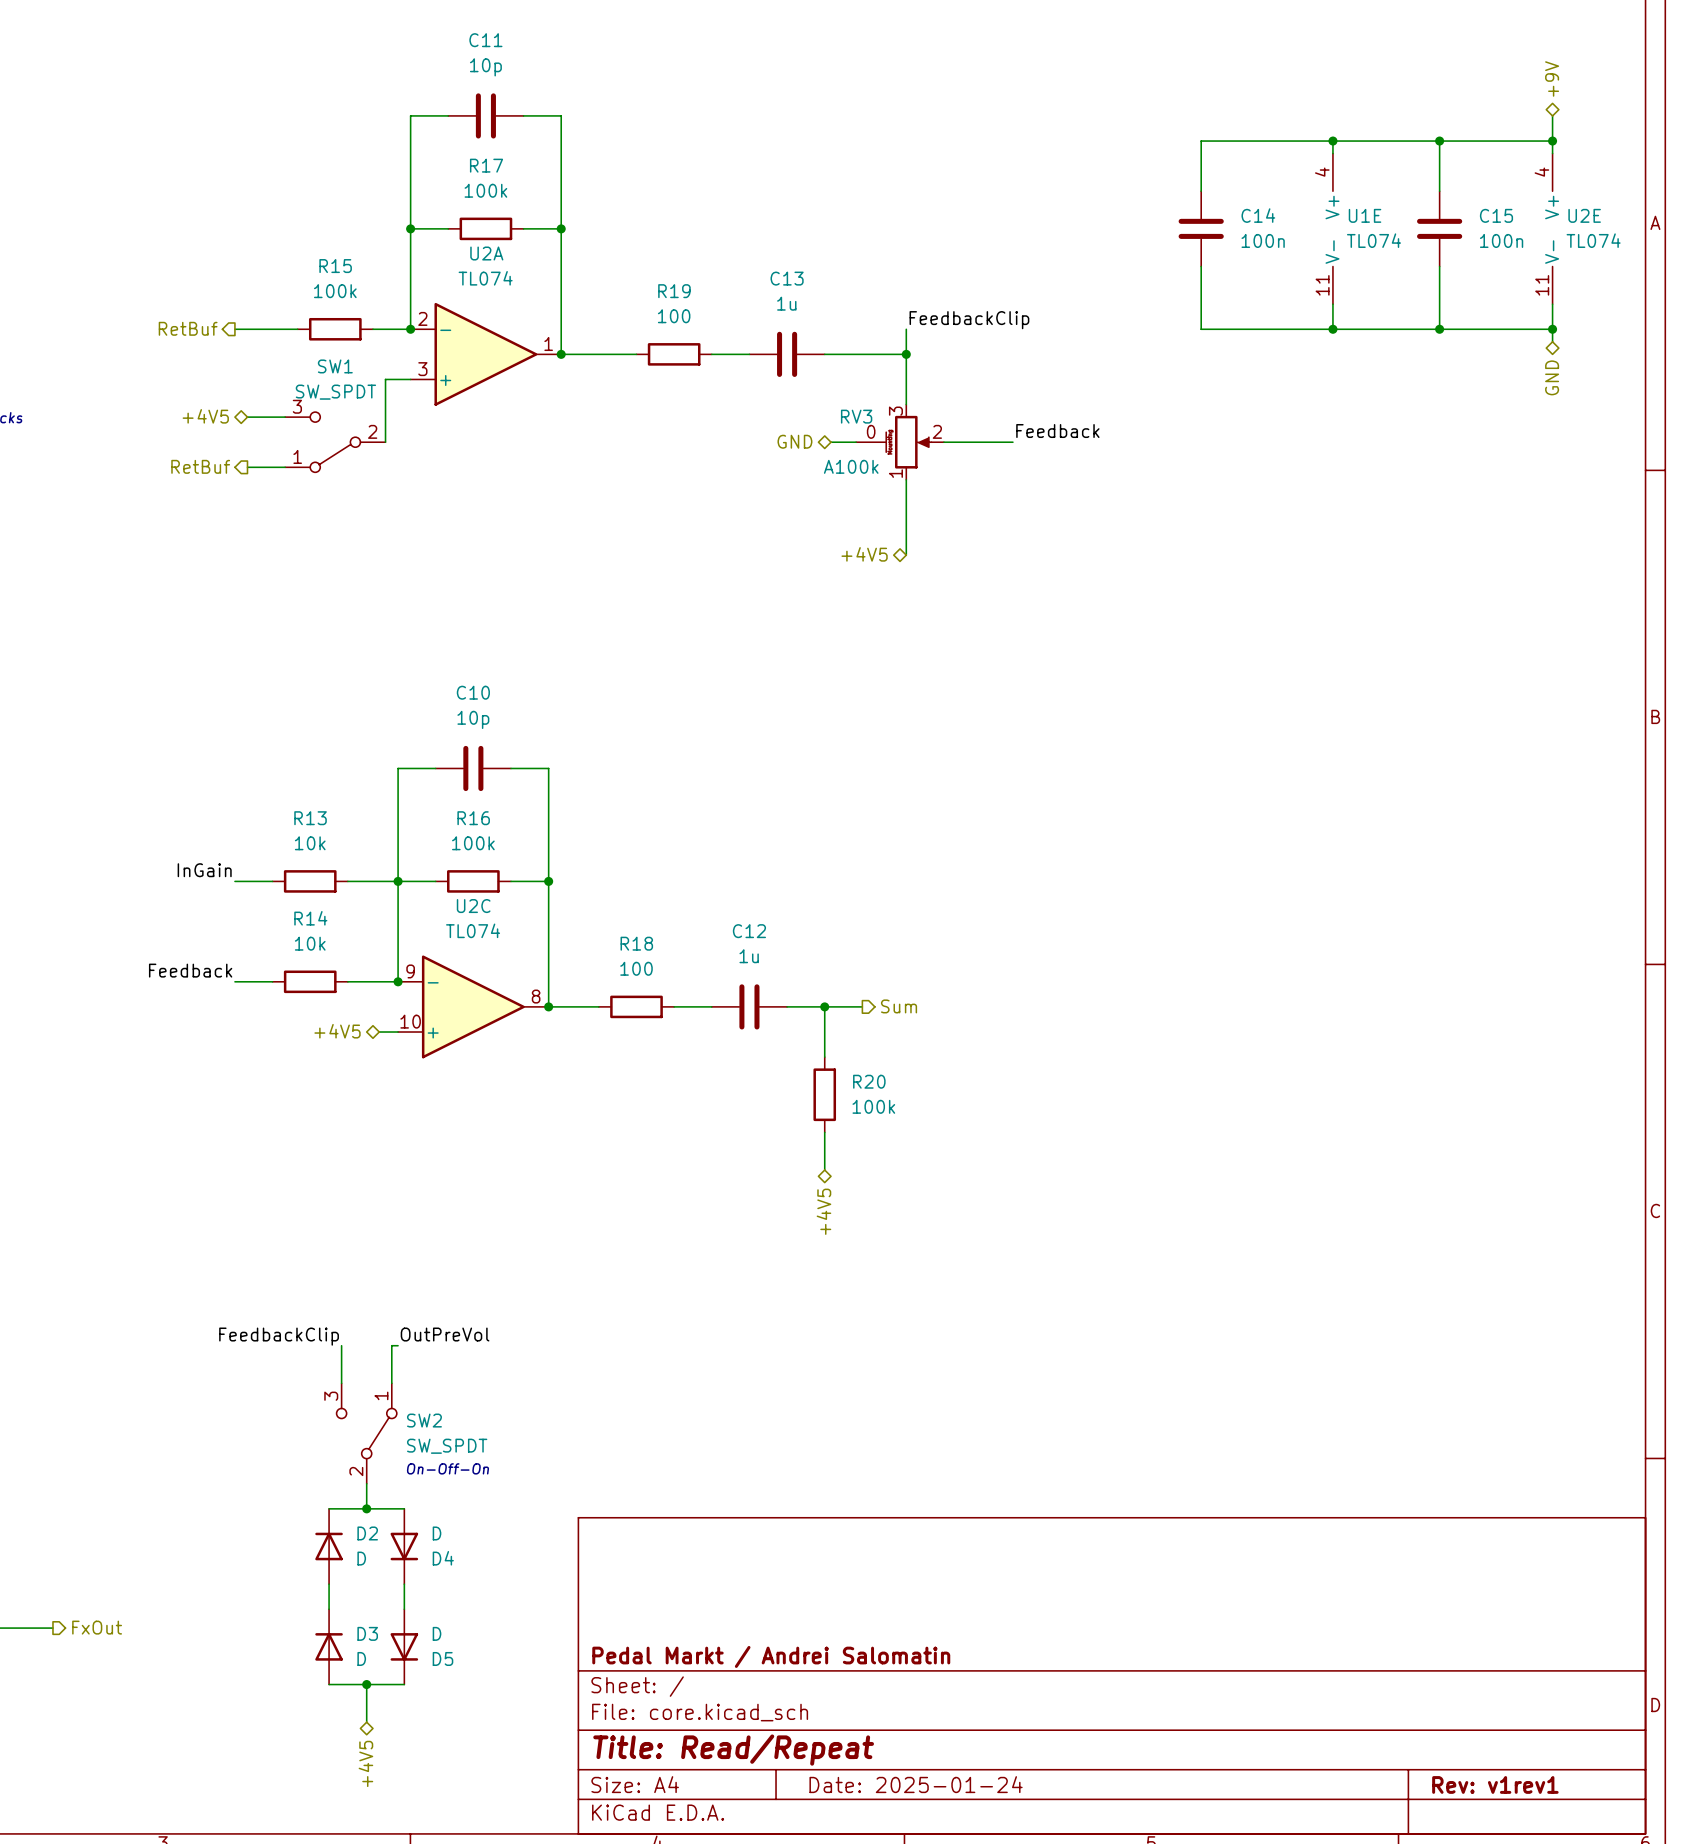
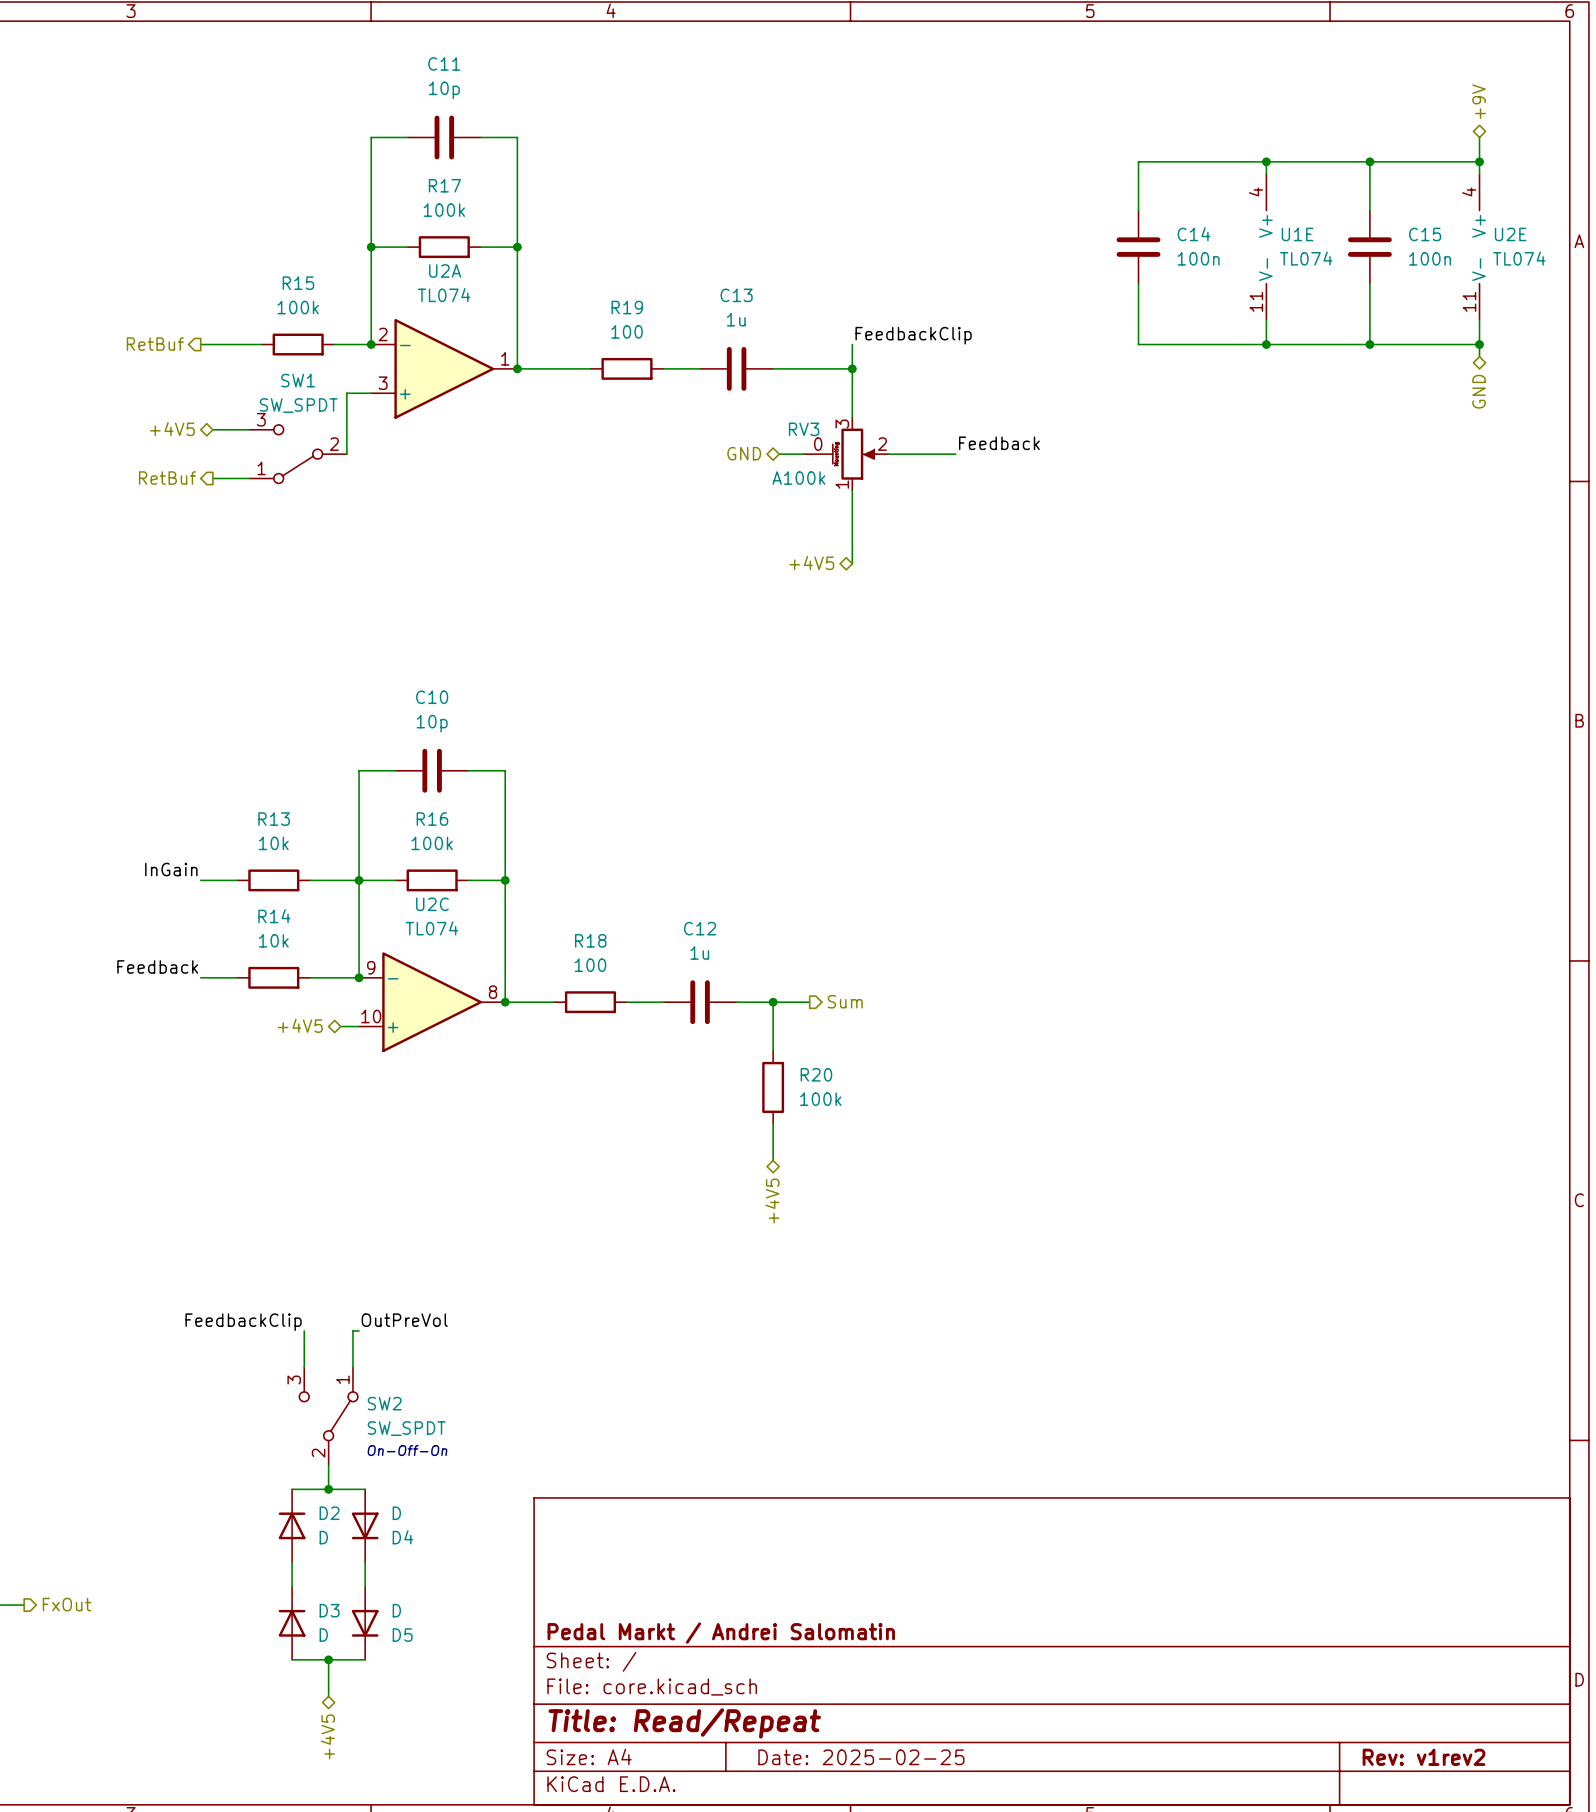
title block: Date: 2025-01-24 (916, 1784) -> Date: 2025-02-25 (861, 1757)
title block: Rev: v1rev1 (1495, 1784) -> Rev: v1rev2 (1424, 1757)

